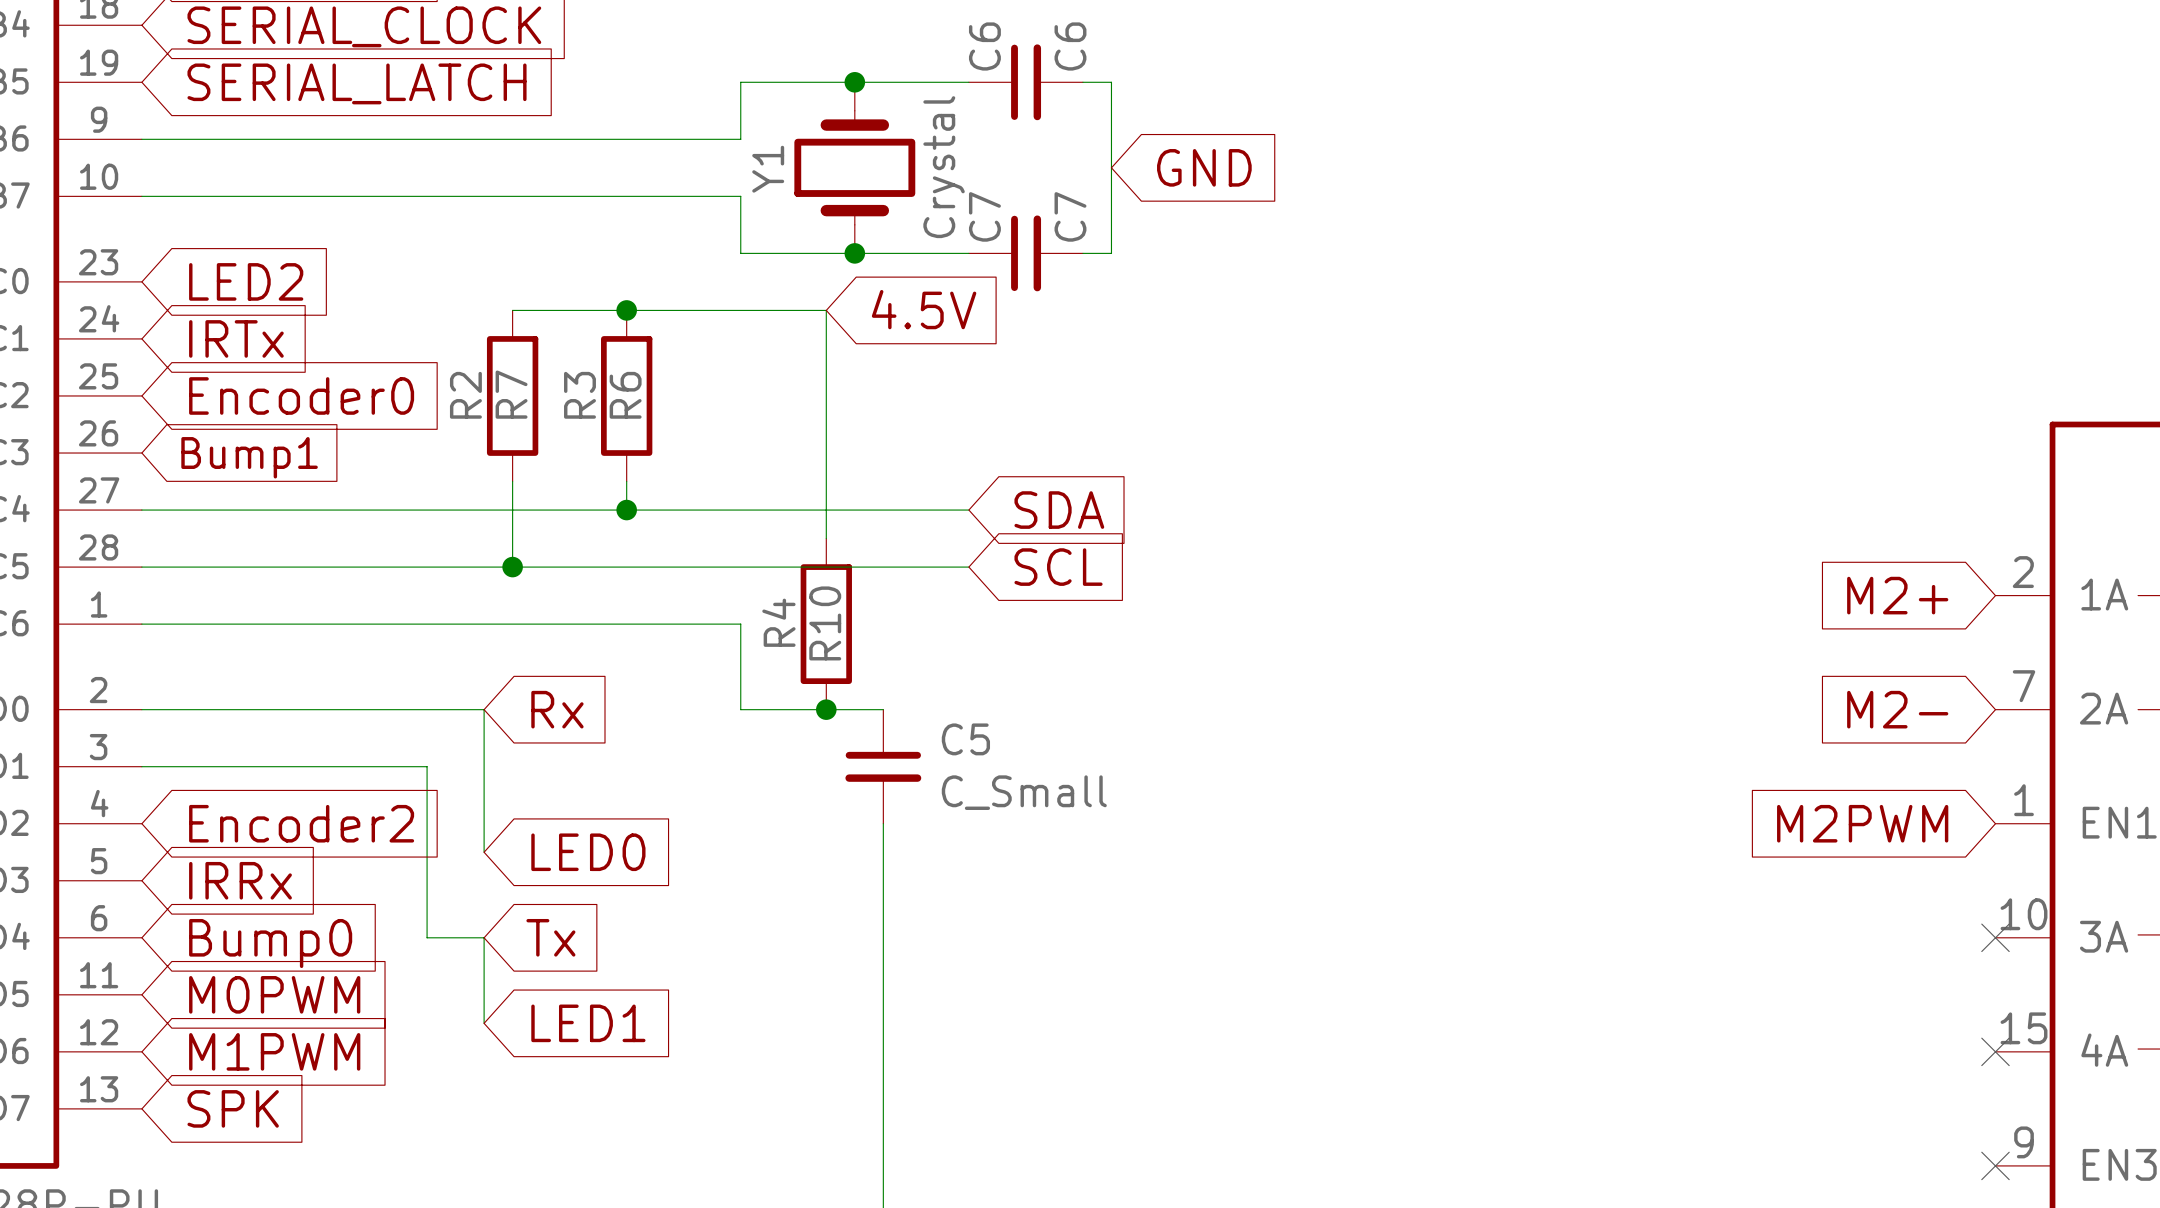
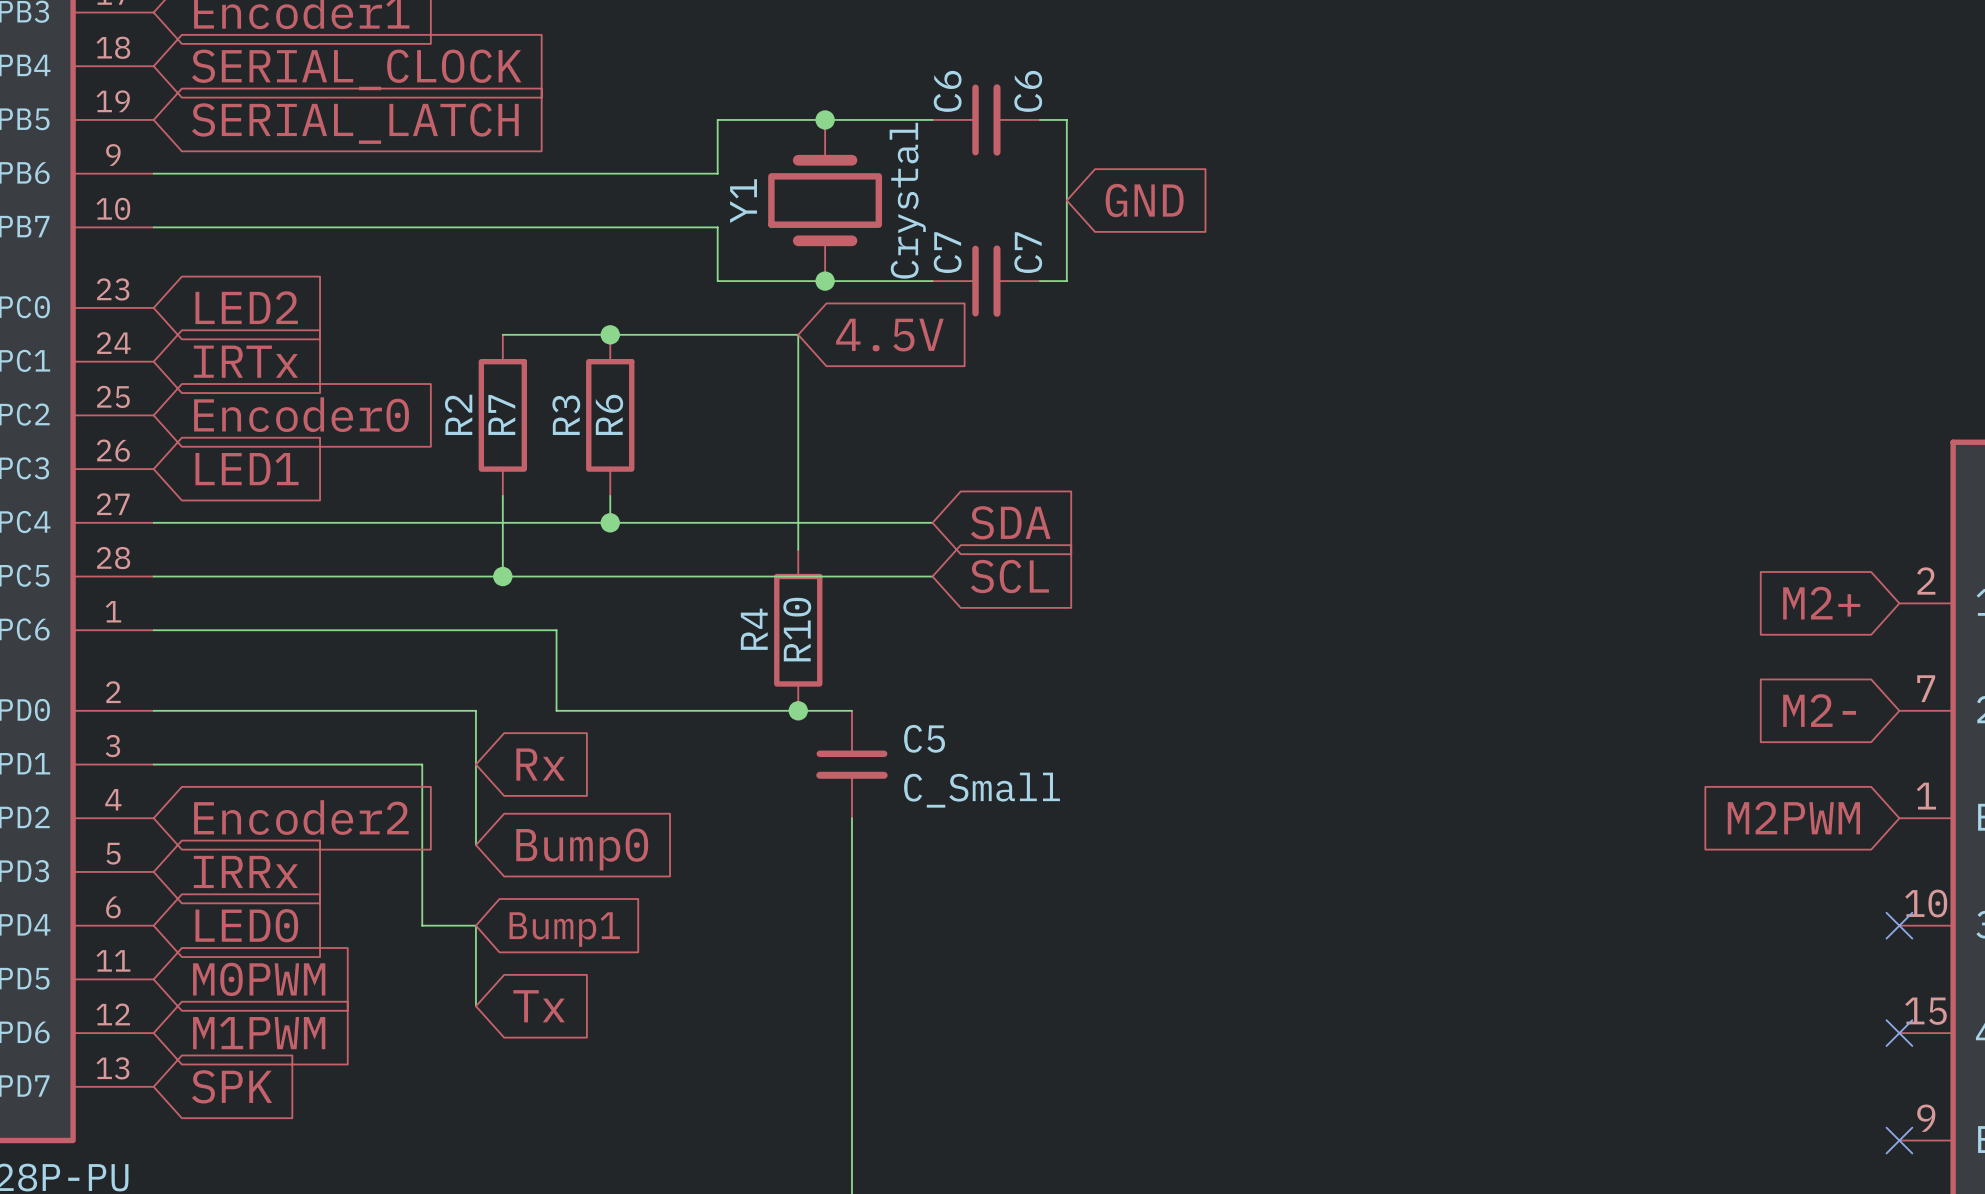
global label: Bump1 (249, 457) -> LED1 (247, 469)
wire: (569, 624) (740, 624) (740, 709) -> (556, 630) (556, 710) (717, 710)
global label position: Rx (557, 709) -> Rx (540, 764)
global label: LED0 (588, 852) -> Bump0 (582, 849)
global label: Tx (550, 937) -> Bump1 (564, 929)
global label: Bump0 (270, 943) -> LED0 (246, 925)
global label: LED1 (588, 1023) -> Tx (539, 1006)

